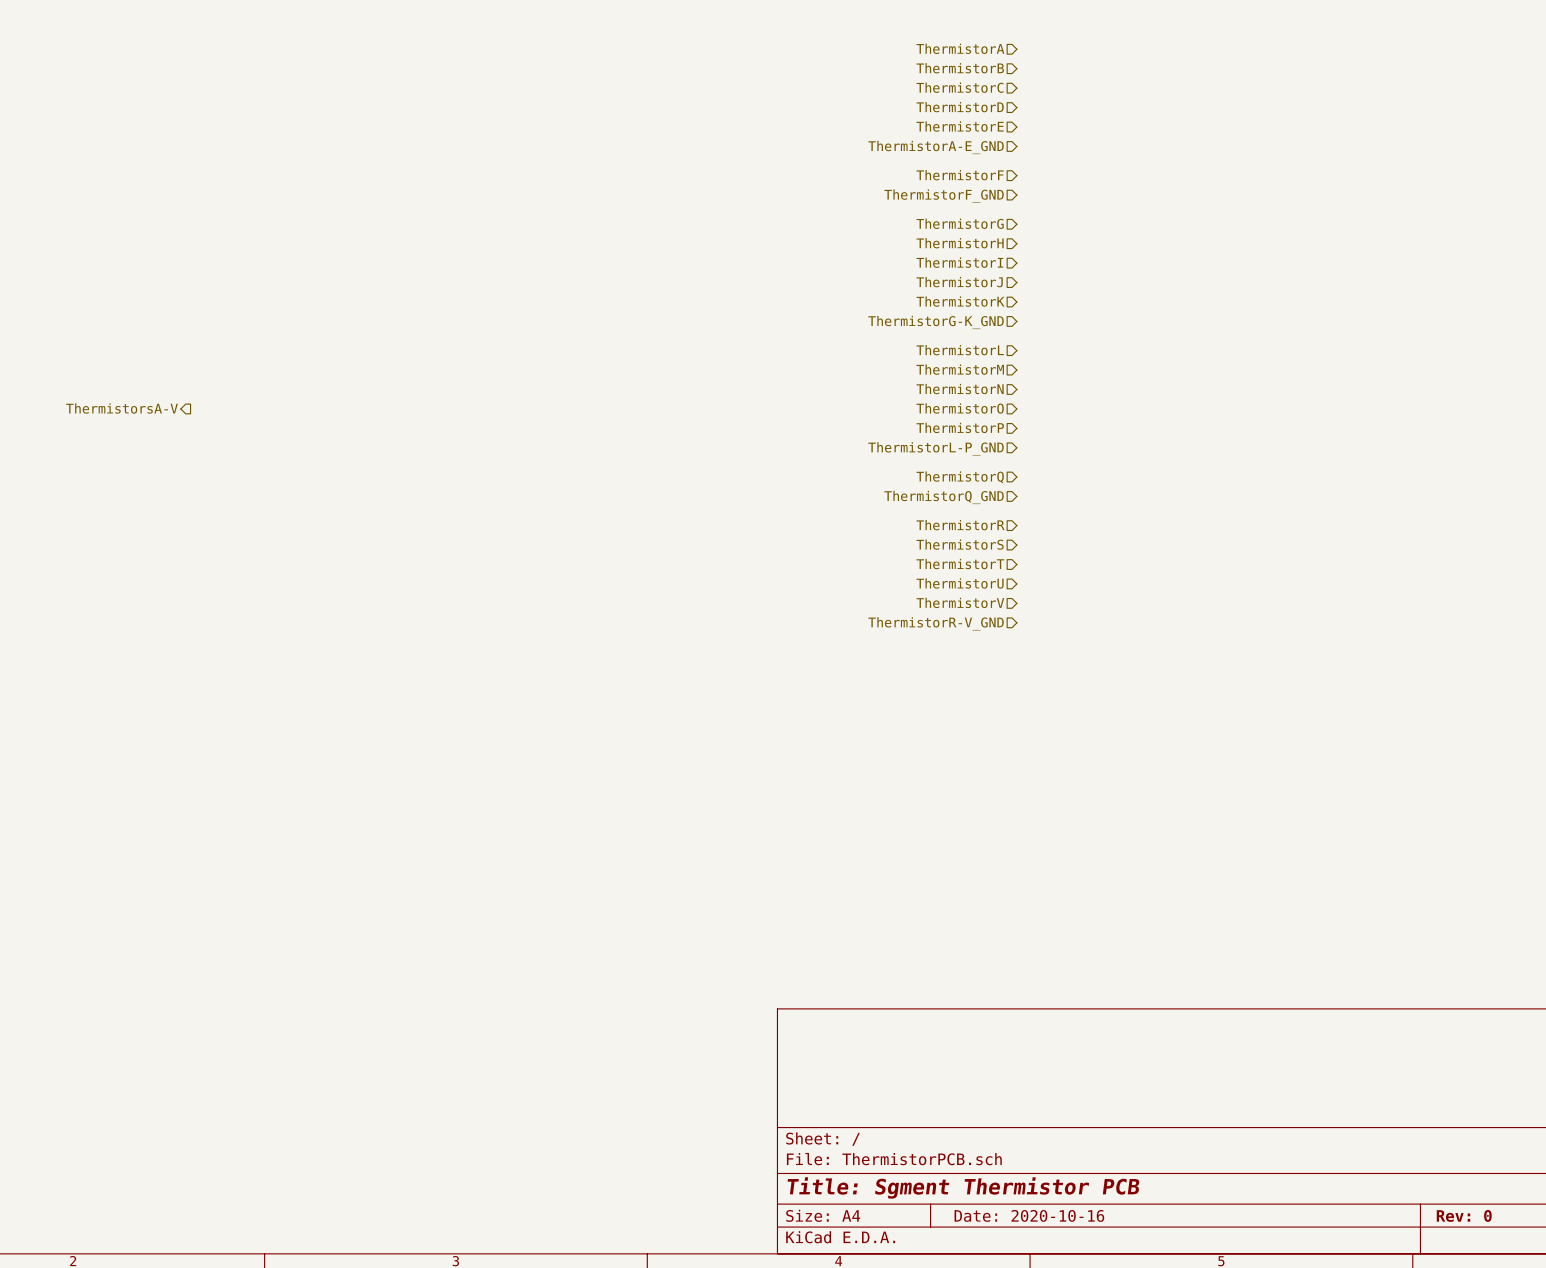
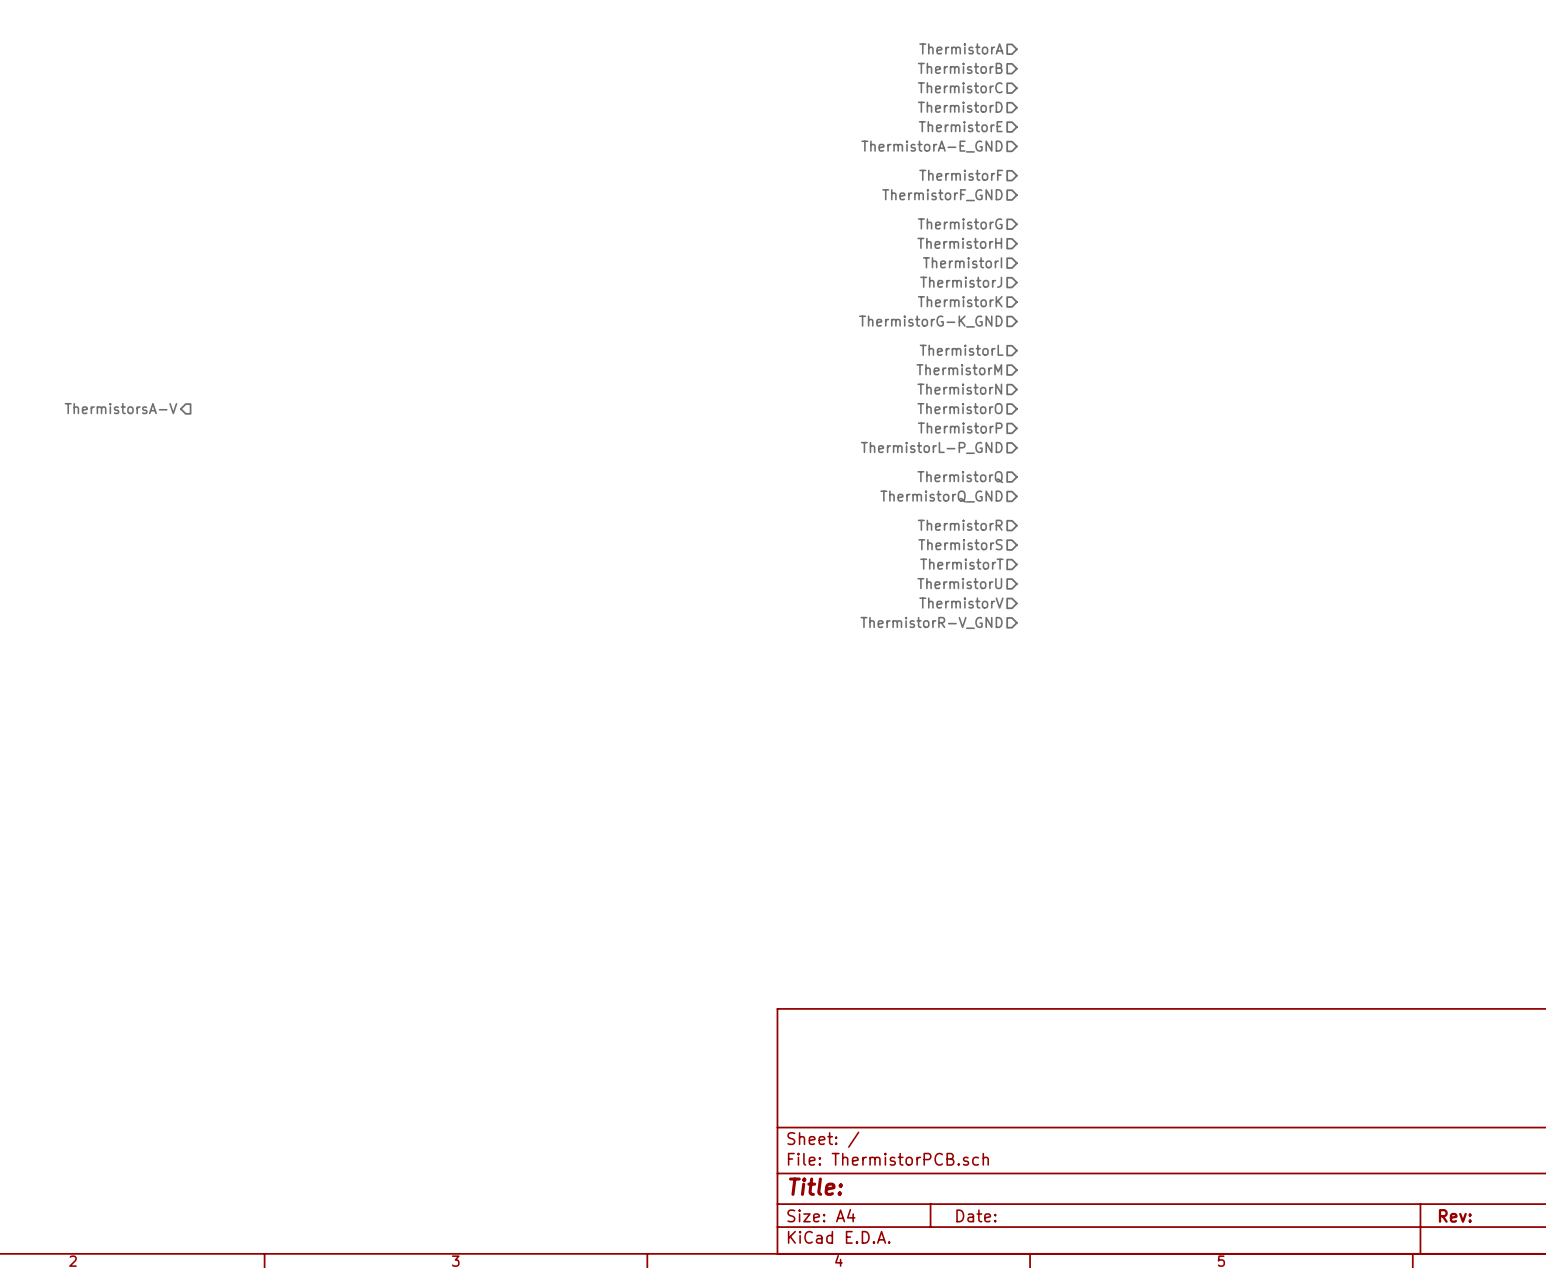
title block: Title: Sgment Thermistor PCB (963, 1187) -> Title: (815, 1186)
title block: Date: 2020-10-16 (1029, 1215) -> Date: (976, 1215)
title block: Rev: 0 (1464, 1215) -> Rev: (1455, 1215)

